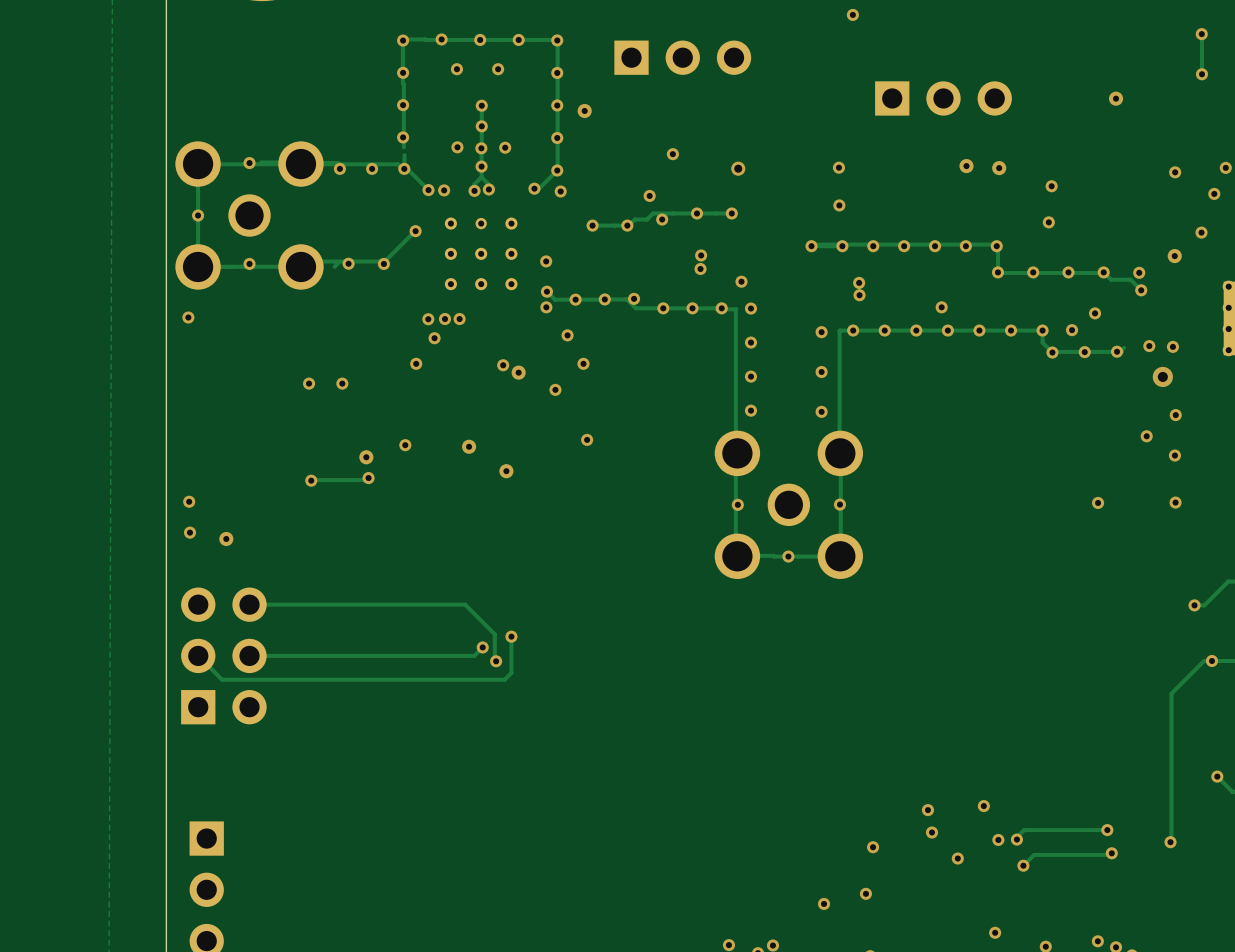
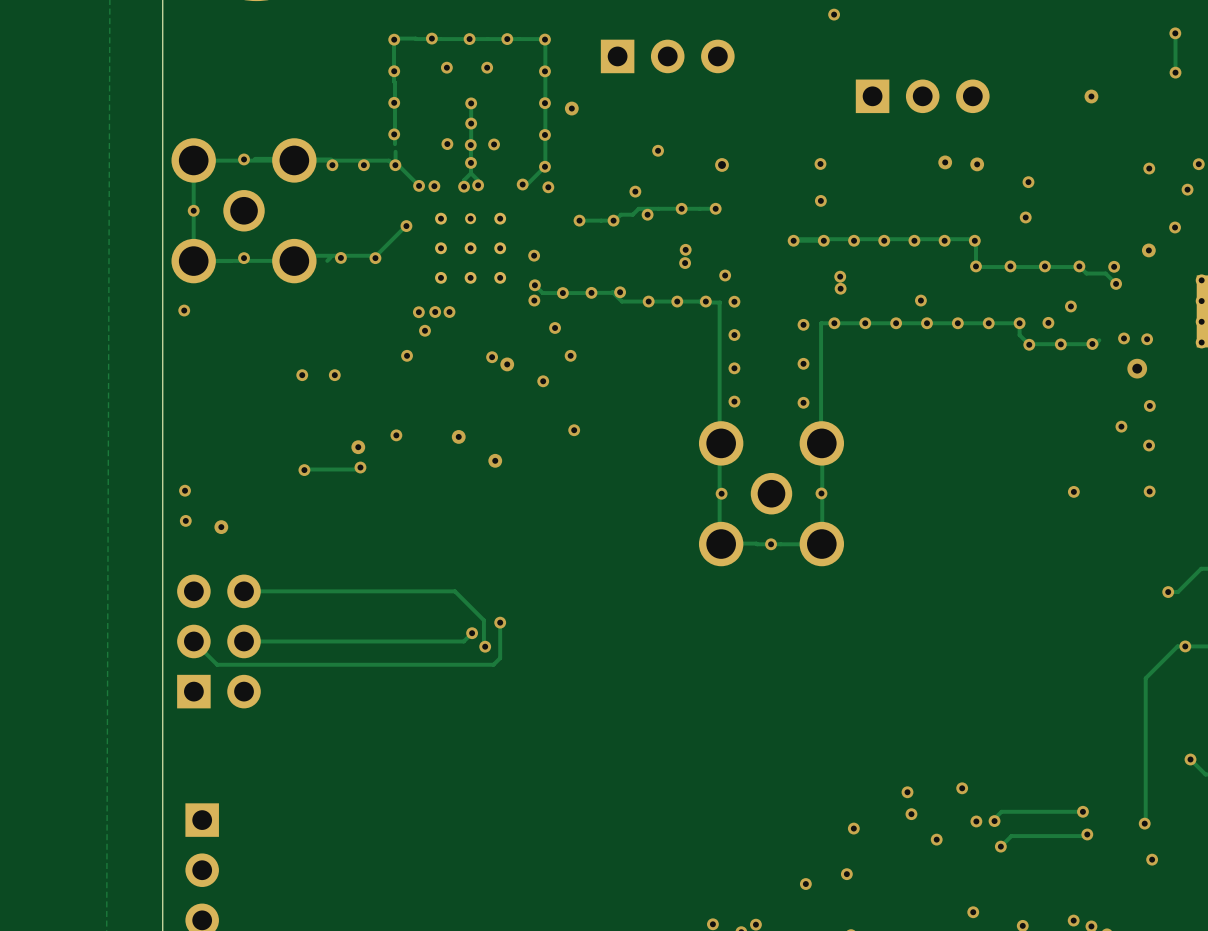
via: none -> (1152, 859)

